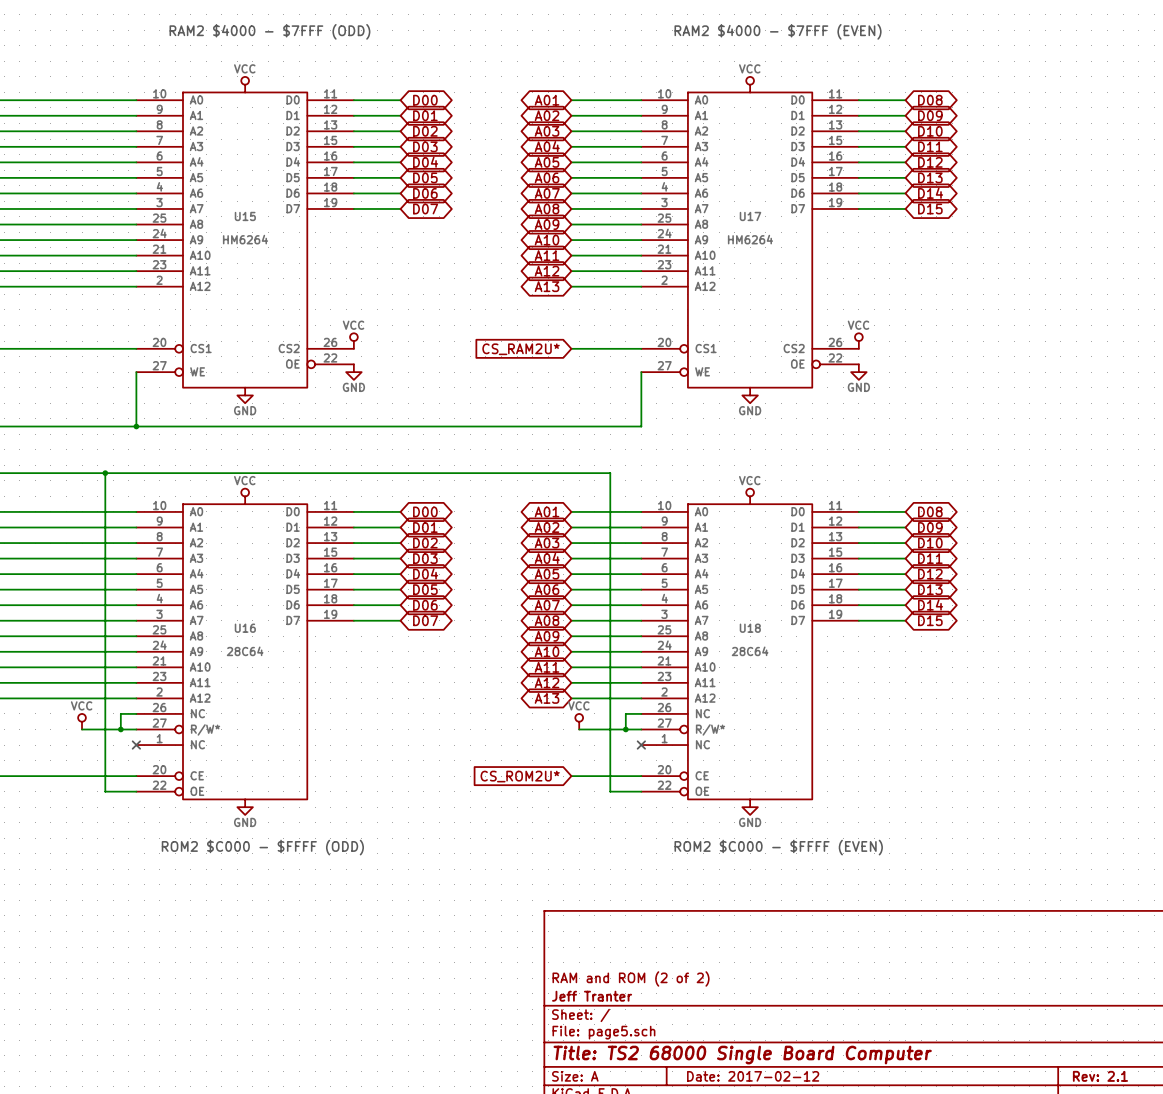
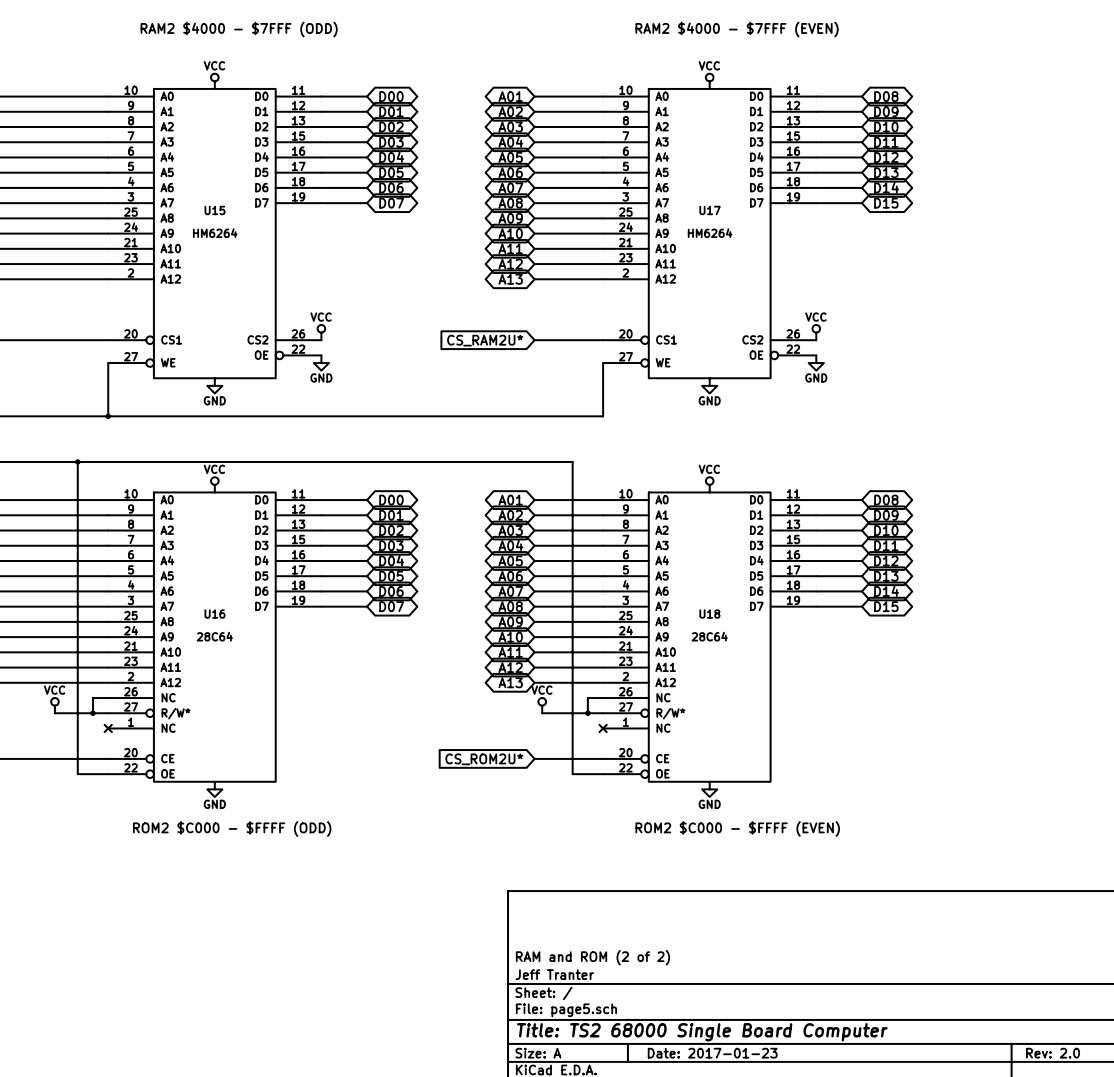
title block: Date: 2017-02-12 (753, 1076) -> Date: 2017-01-23 (712, 1053)
title block: Rev: 2.1 (1100, 1076) -> Rev: 2.0 (1053, 1053)

